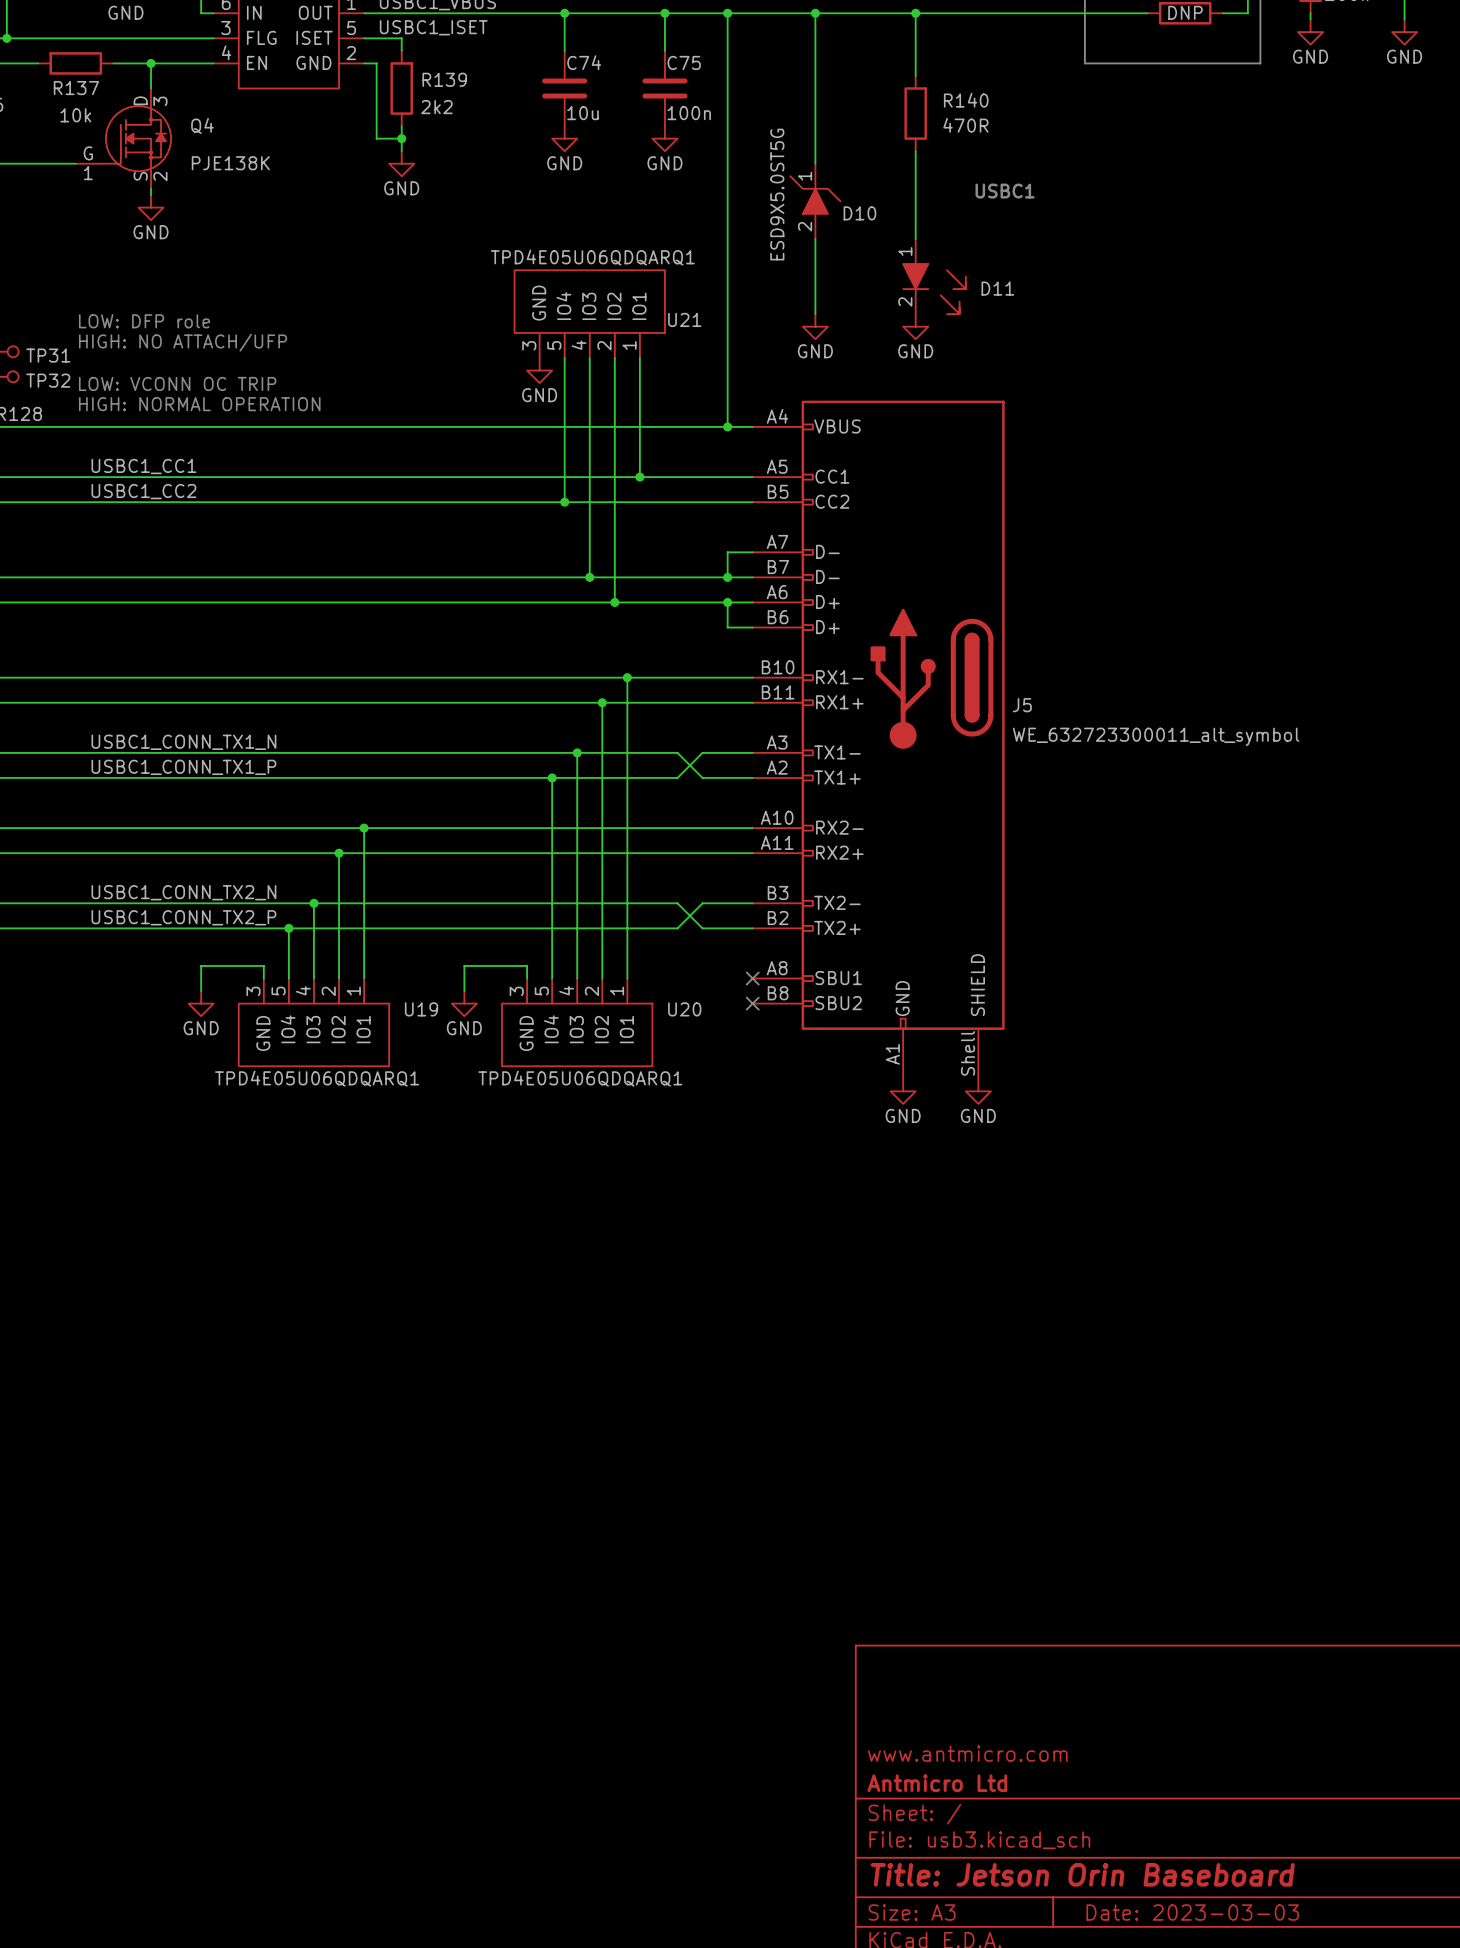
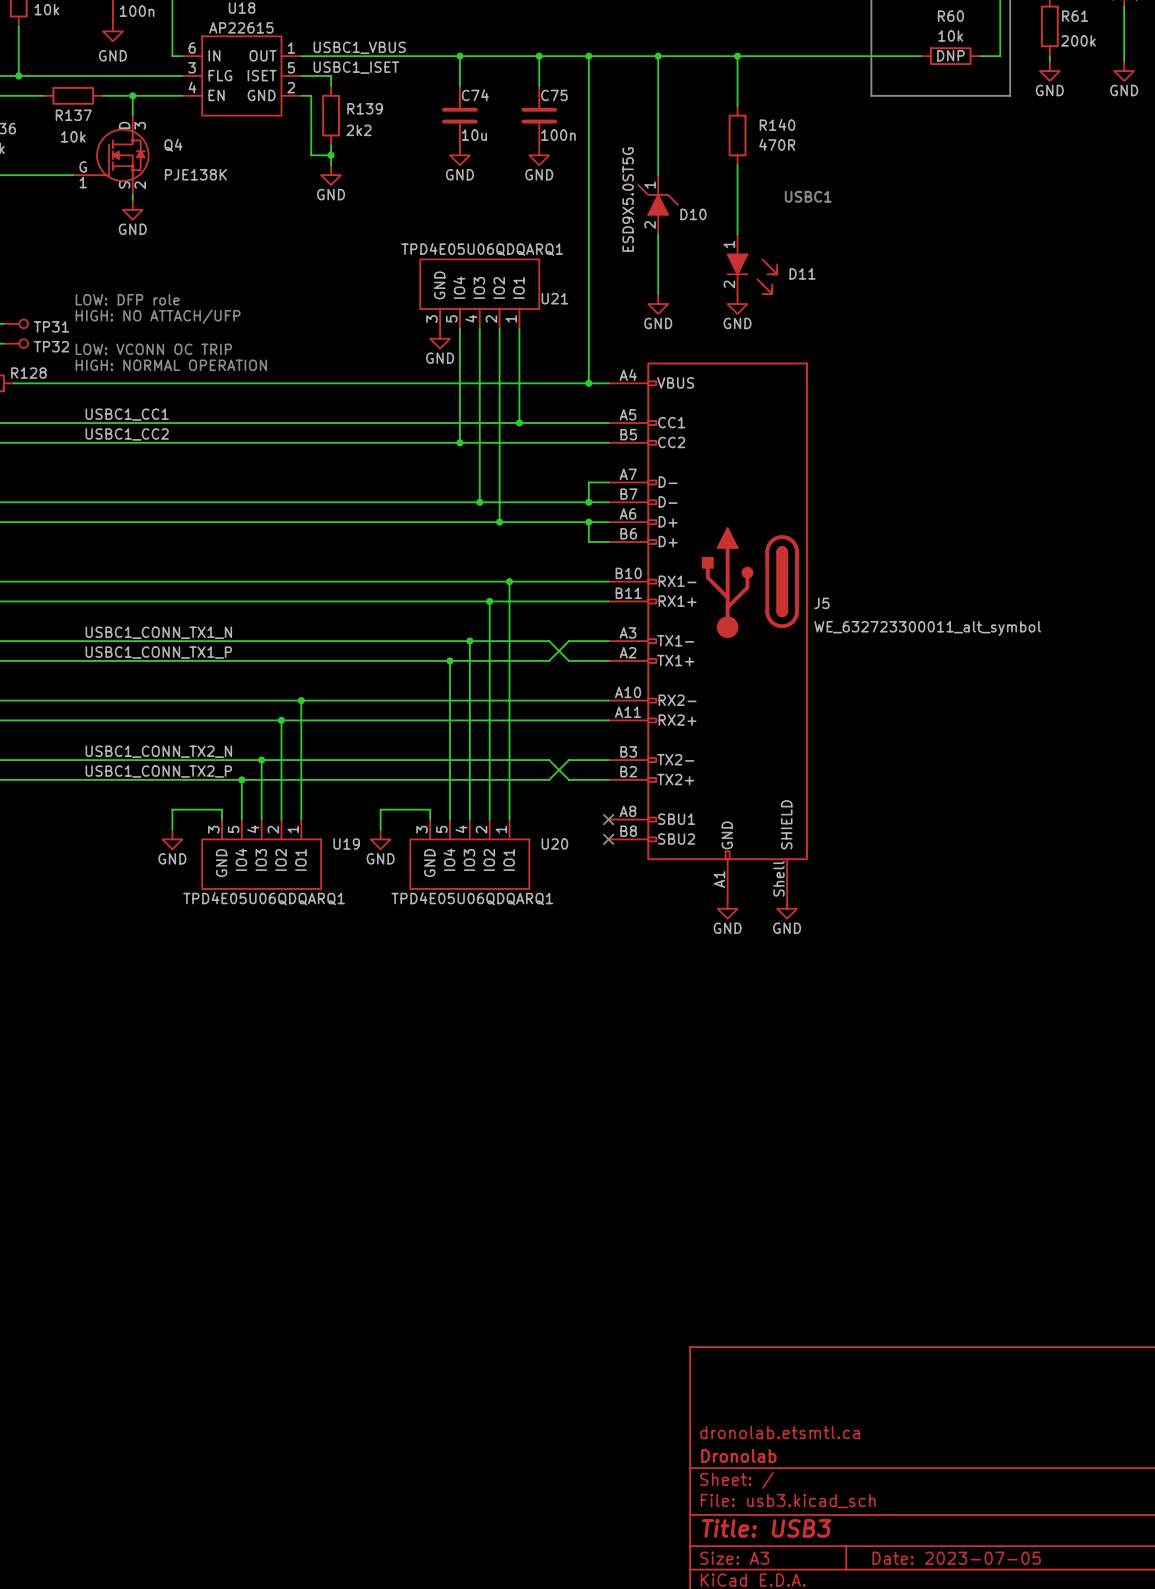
title block: www.antmicro.com (967, 1753) -> dronolab.etsmtl.ca (780, 1432)
title block: Antmicro Ltd (937, 1783) -> Dronolab (738, 1455)
title block: Title: Jetson Orin Baseboard (1082, 1874) -> Title: USB3 (766, 1528)
title block: Date: 2023-03-03 (1192, 1912) -> Date: 2023-07-05 (956, 1558)

